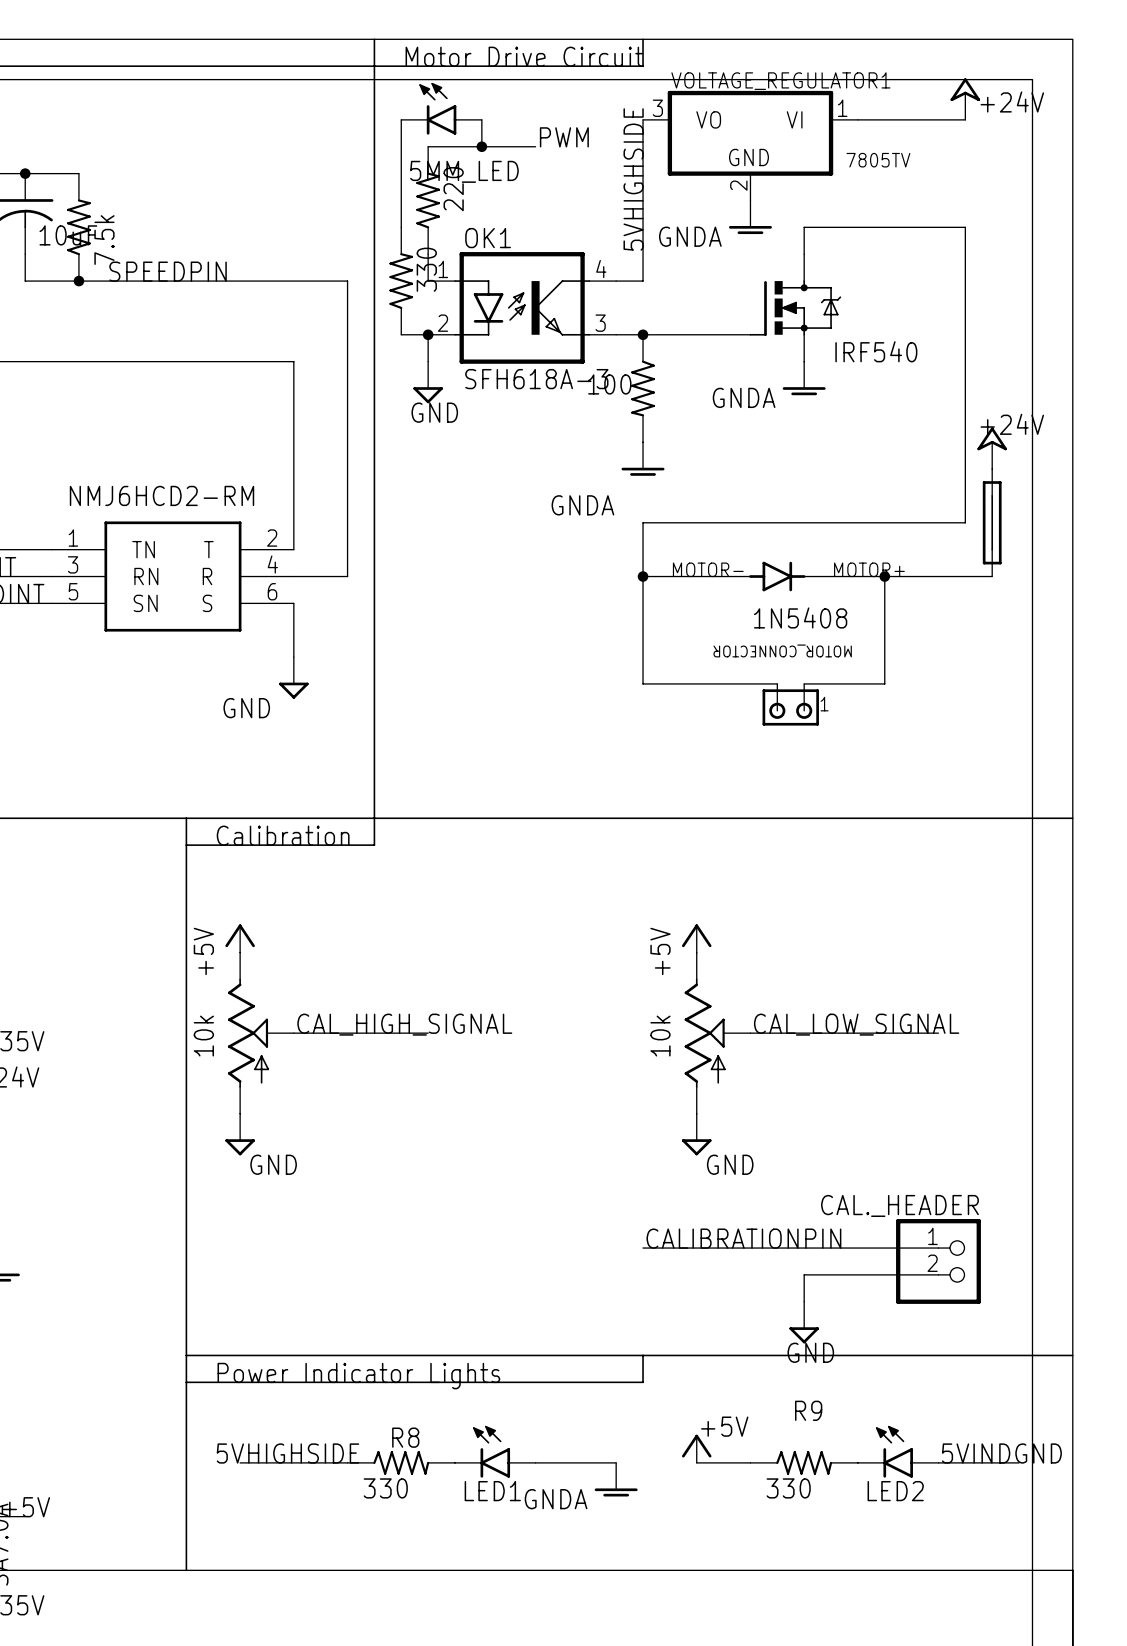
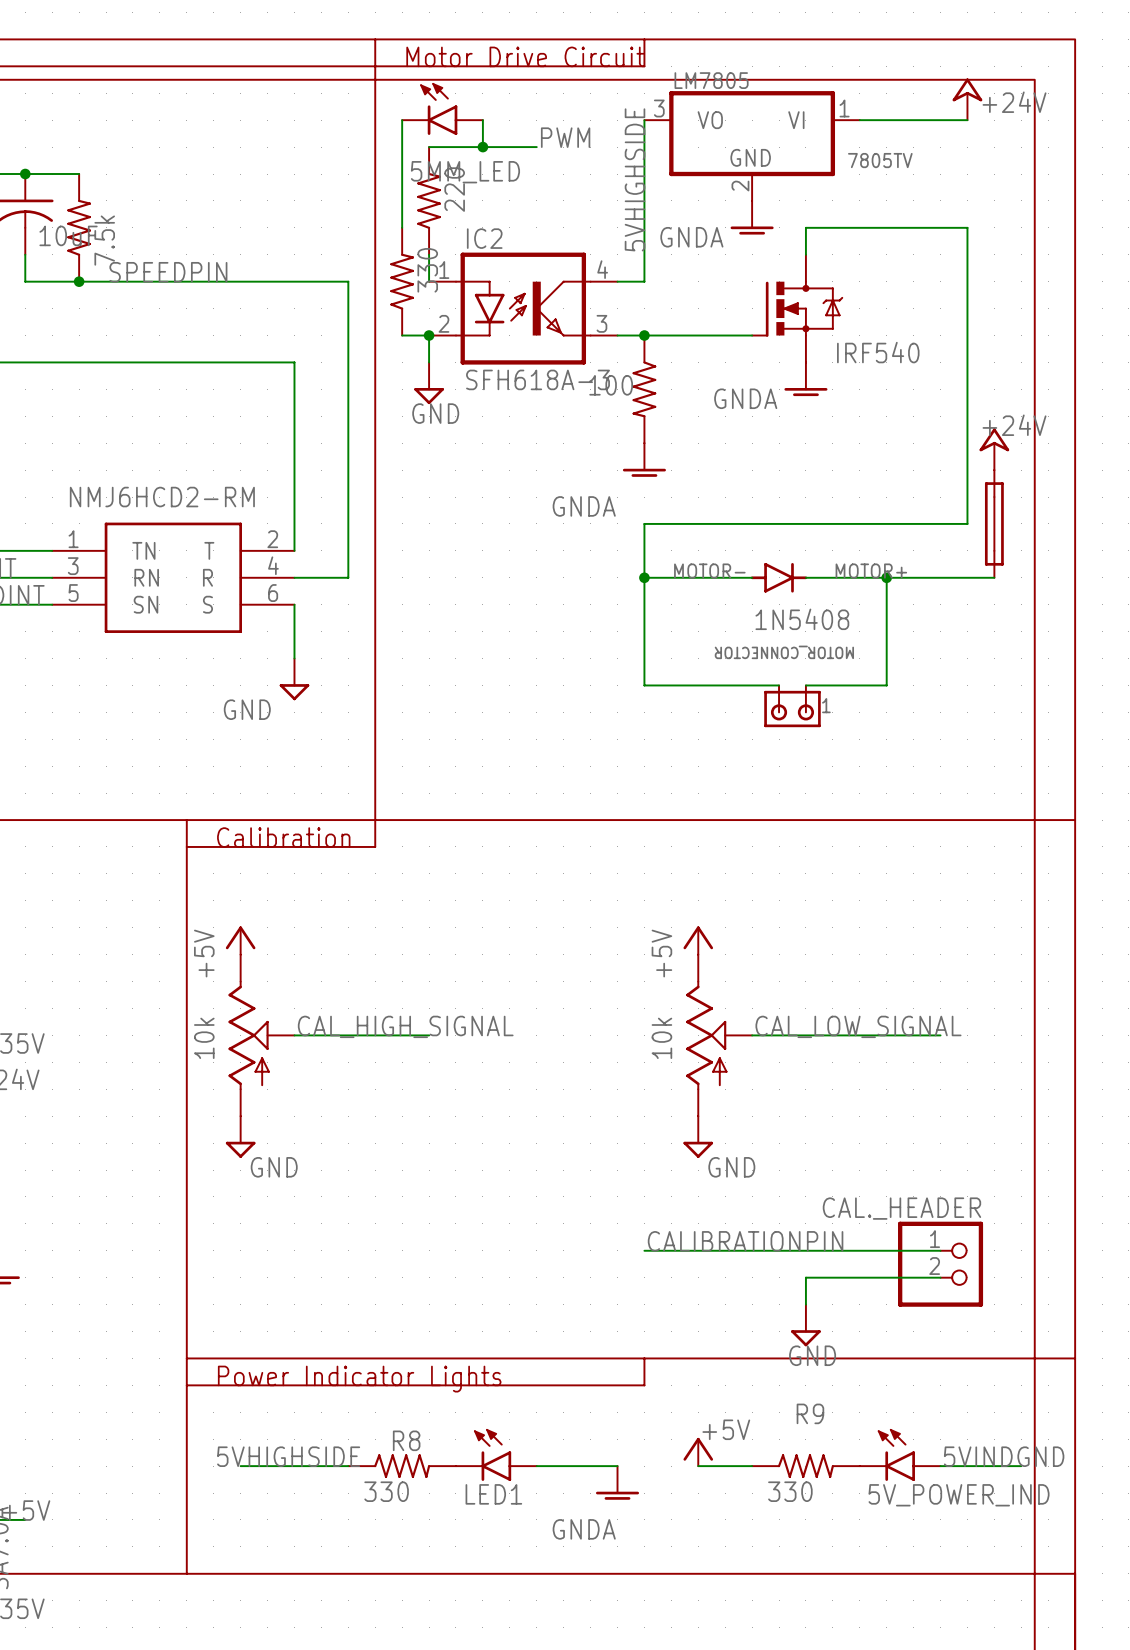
VOLTAGE_REGULATOR1 name: VOLTAGE_REGULATOR1 (780, 81) -> LM7805 (711, 80)
OK1 name: OK1 (488, 238) -> IC2 (484, 238)
LED2 name: LED2 (895, 1491) -> 5V_POWER_IND (959, 1495)
power symbol text position: GNDA (556, 1499) -> GNDA (584, 1529)

